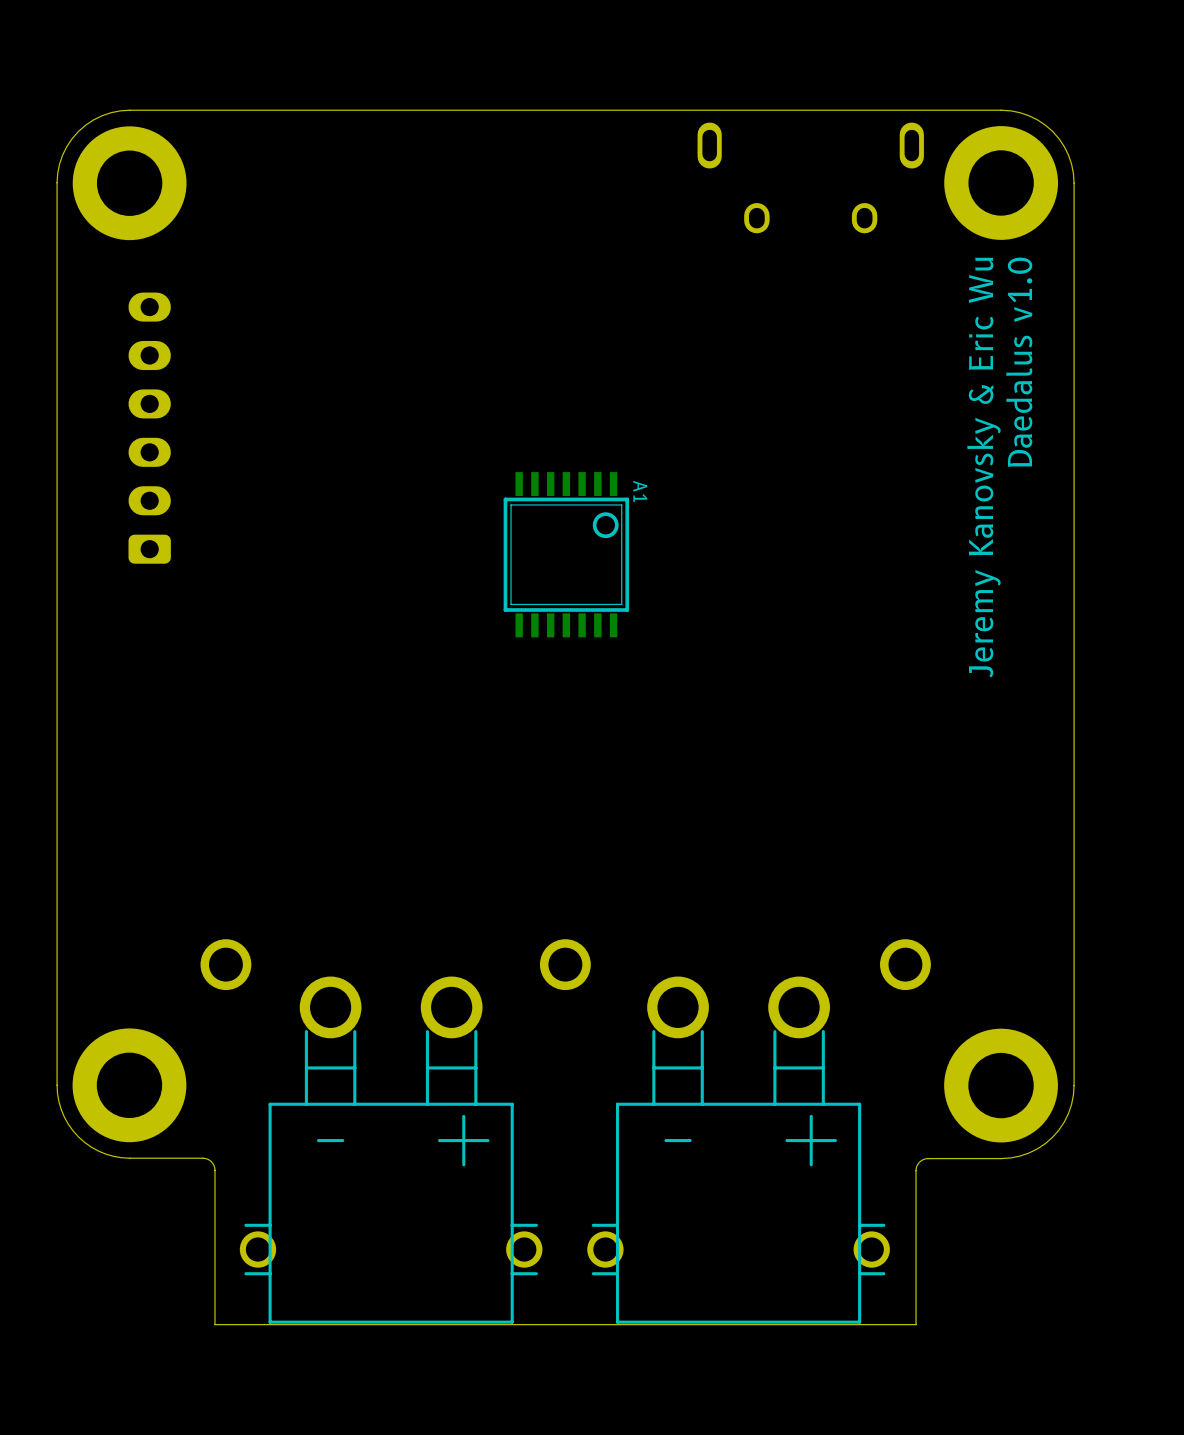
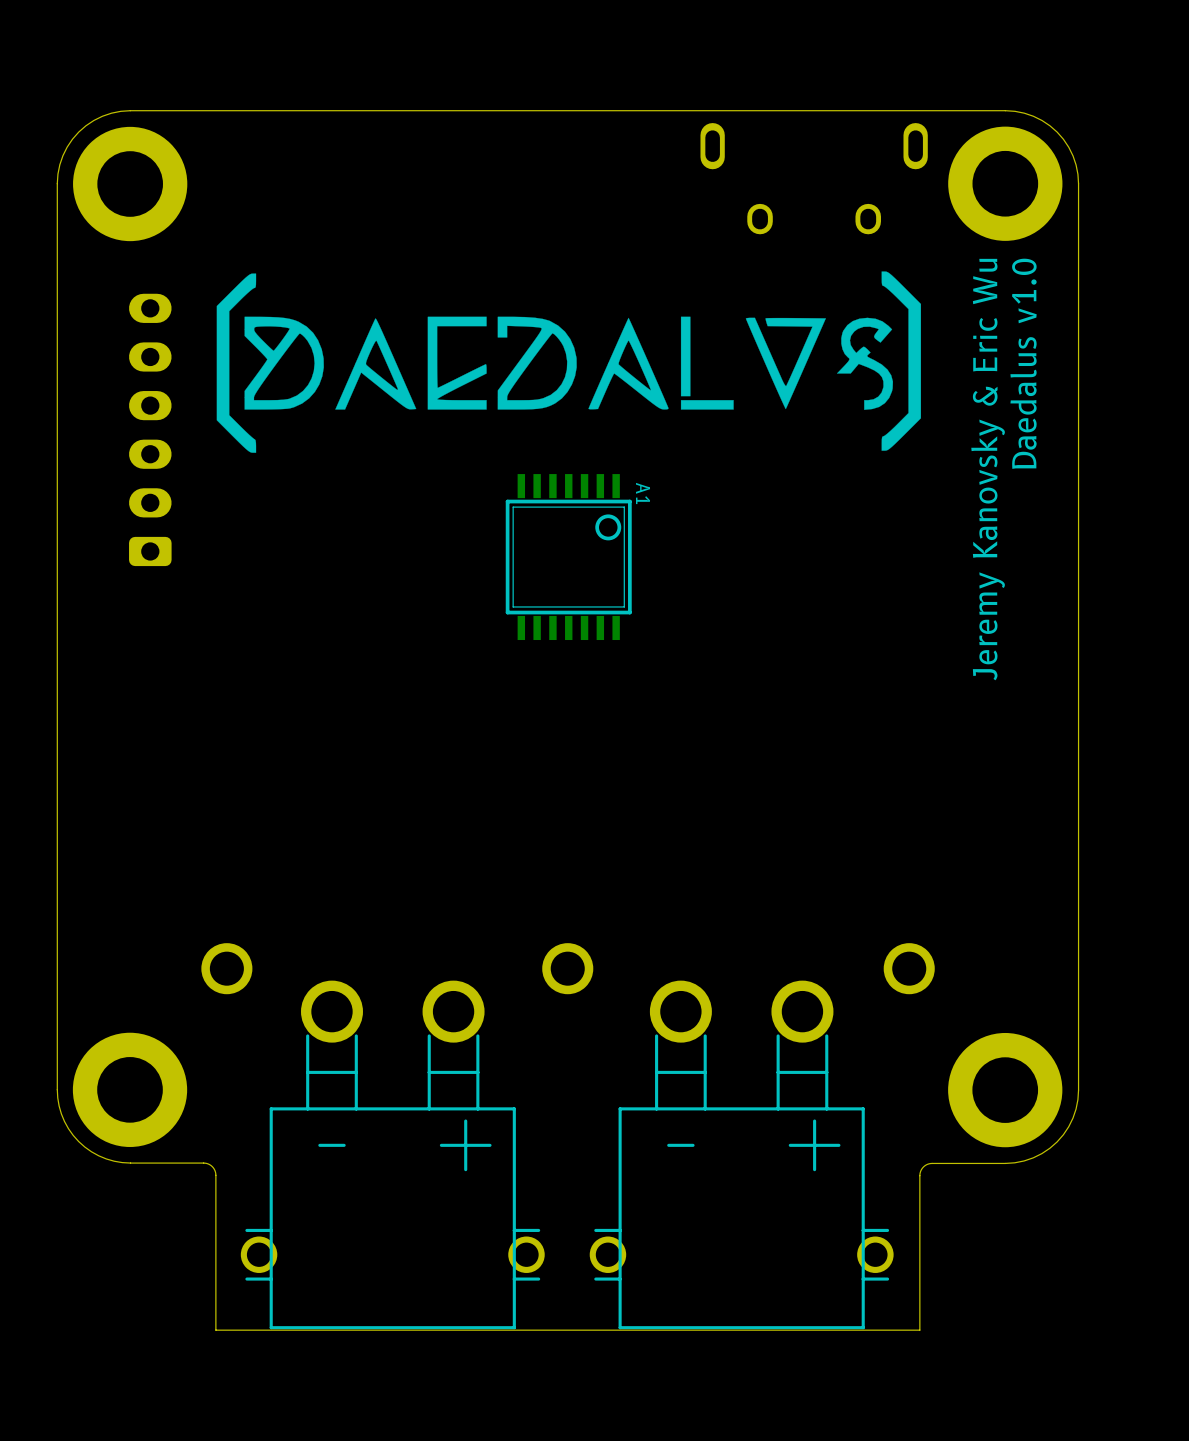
drawing: none -> [216, 271, 922, 453]

